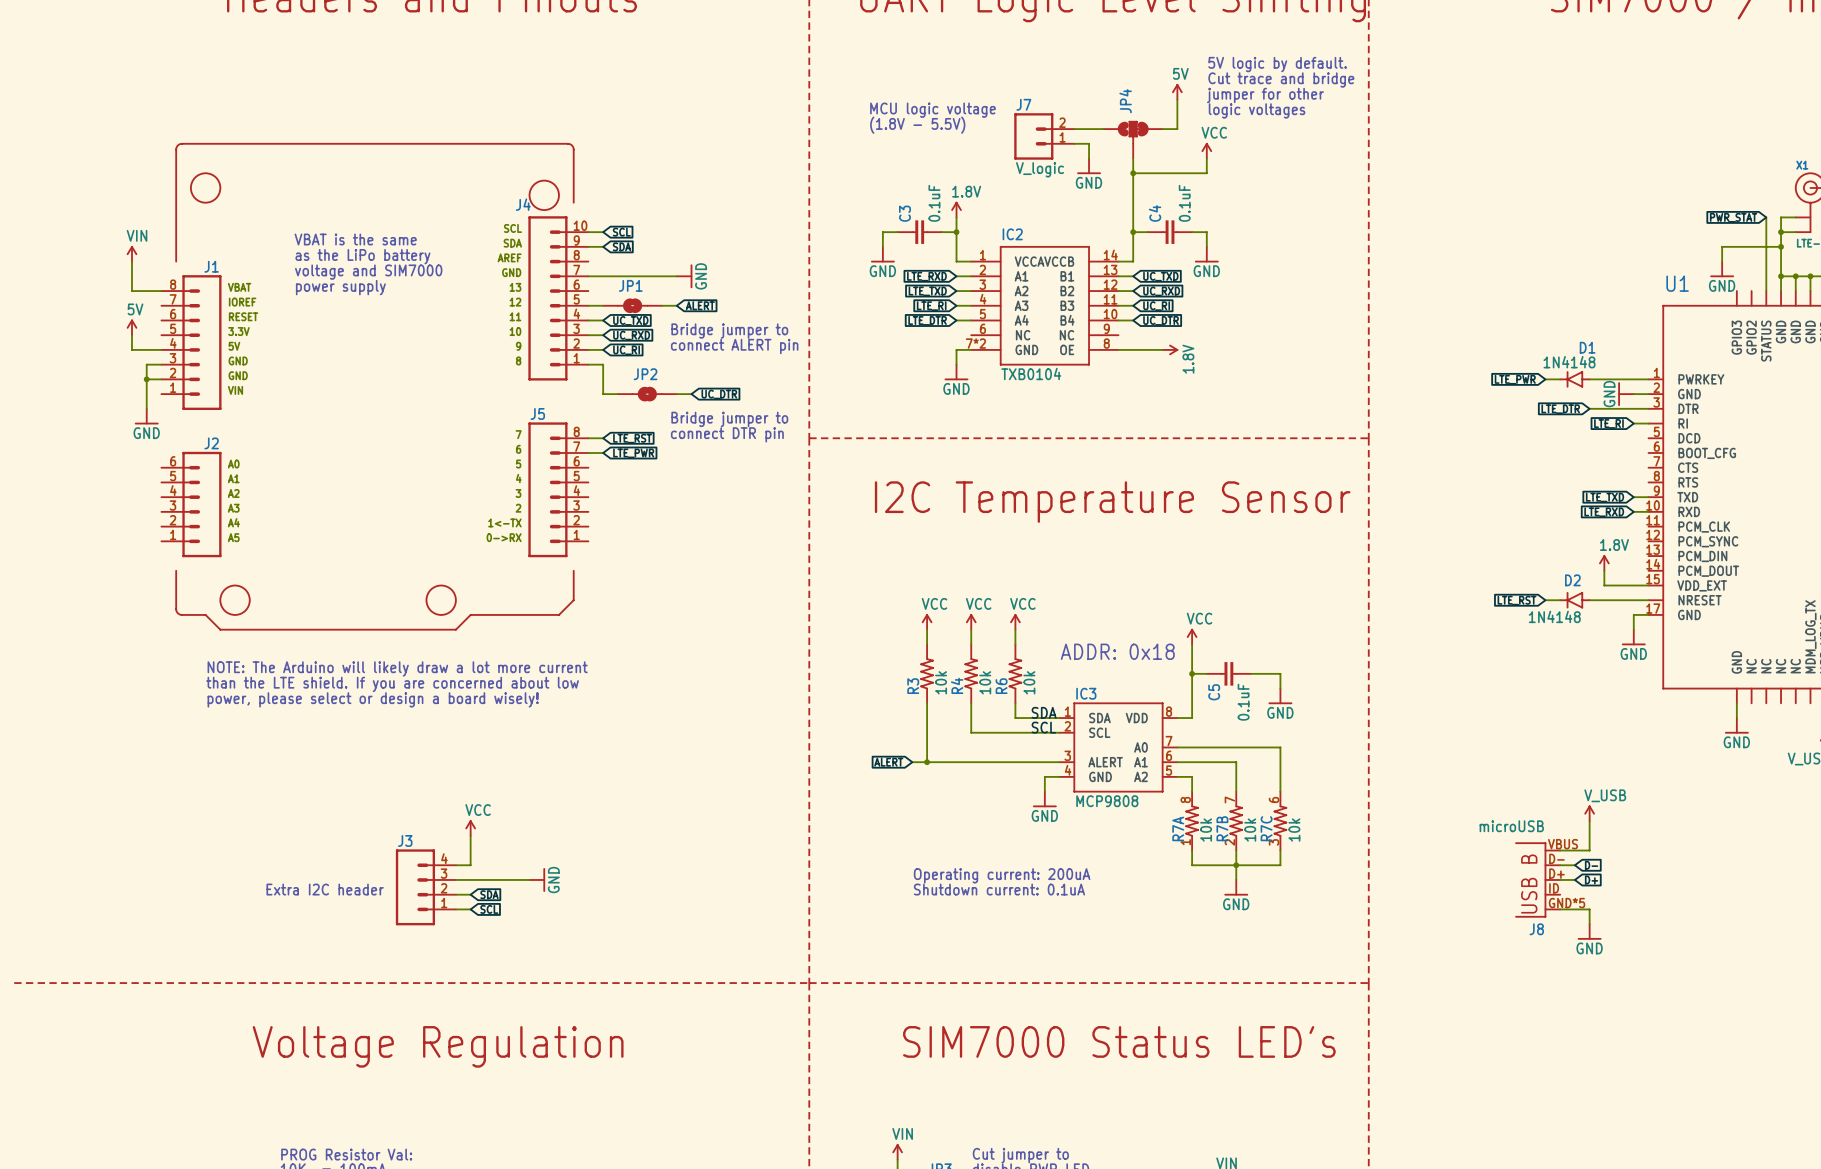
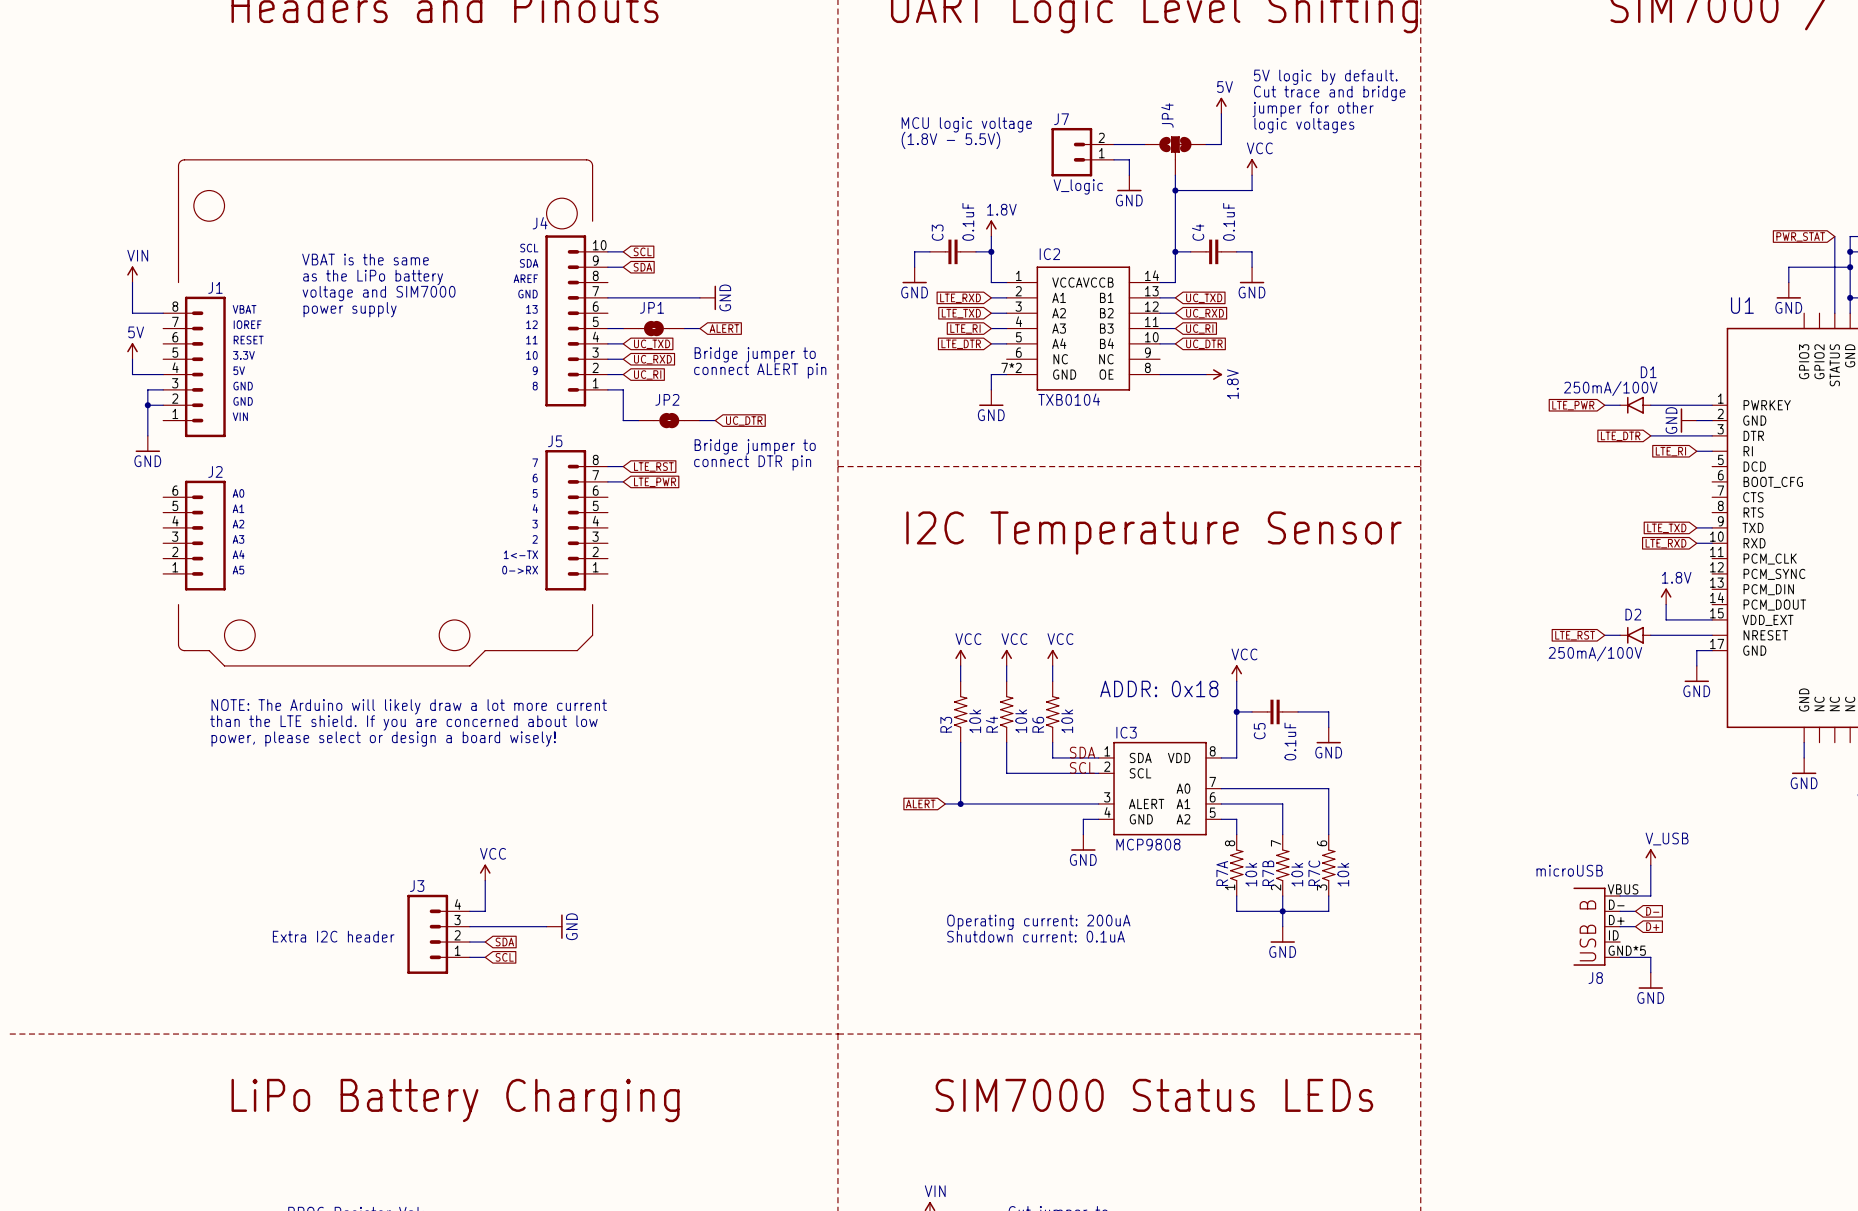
D1 value: 1N4148 (1569, 362) -> 250mA/100V (1610, 388)
D2 value: 1N4148 (1554, 616) -> 250mA/100V (1595, 653)
text: SIM7000 Status LED's (1119, 1041) -> SIM7000 Status LEDs (1154, 1095)
text: Voltage Regulation (438, 1046) -> none
text: none -> LiPo Battery Charging (455, 1100)

